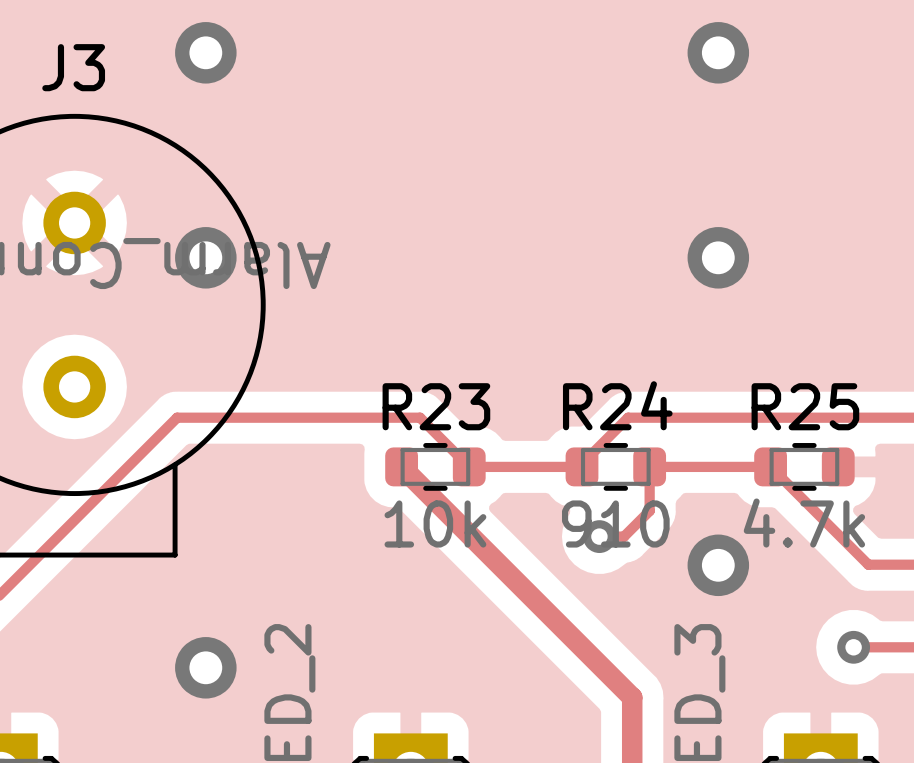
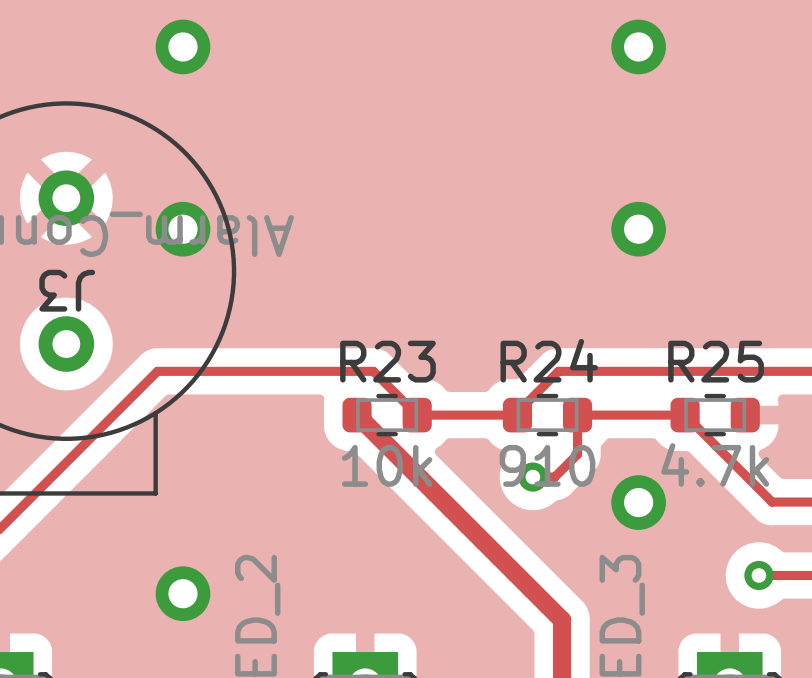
J3 name rotation: 0° (73, 67) -> 180° (67, 290)
J3 name position: J3 (73, 67) -> J3 (67, 290)

